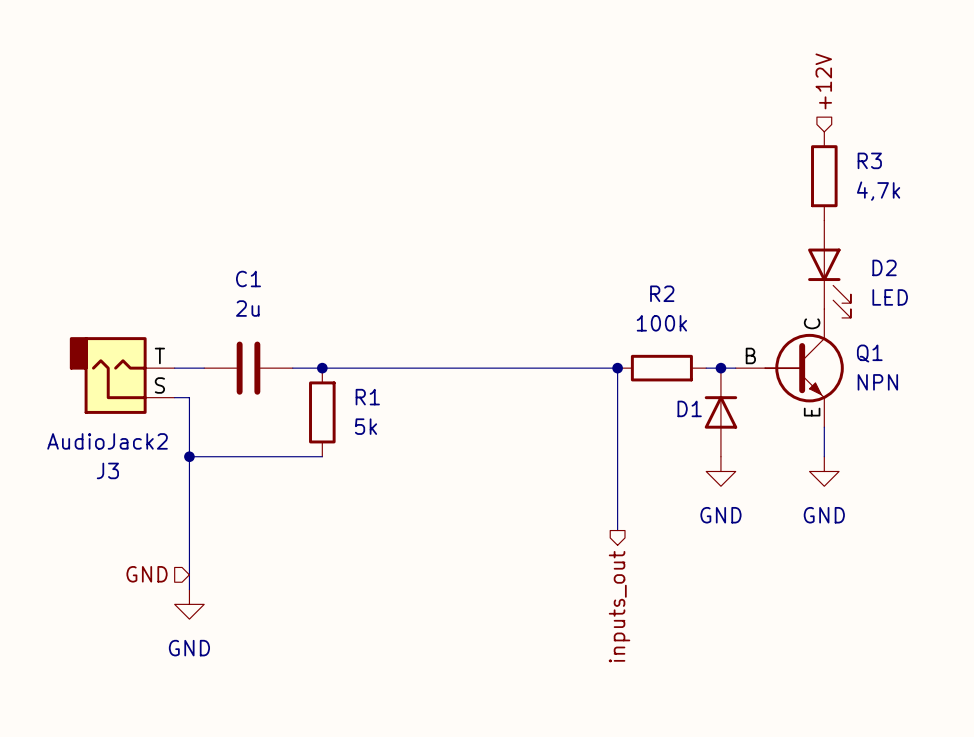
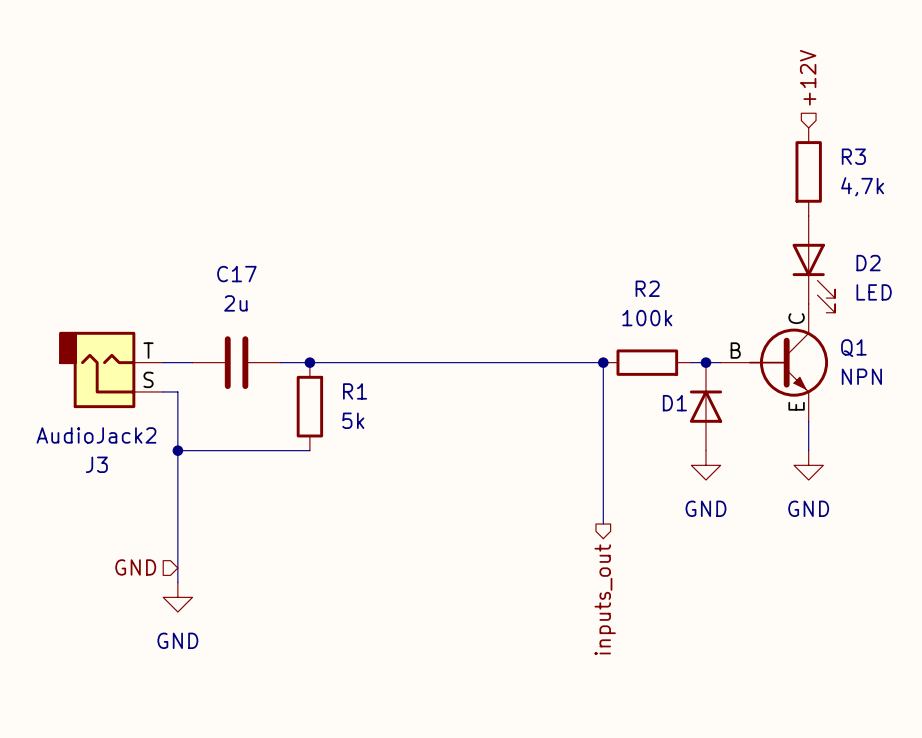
C1 name: C1 (248, 279) -> C17 (236, 274)

